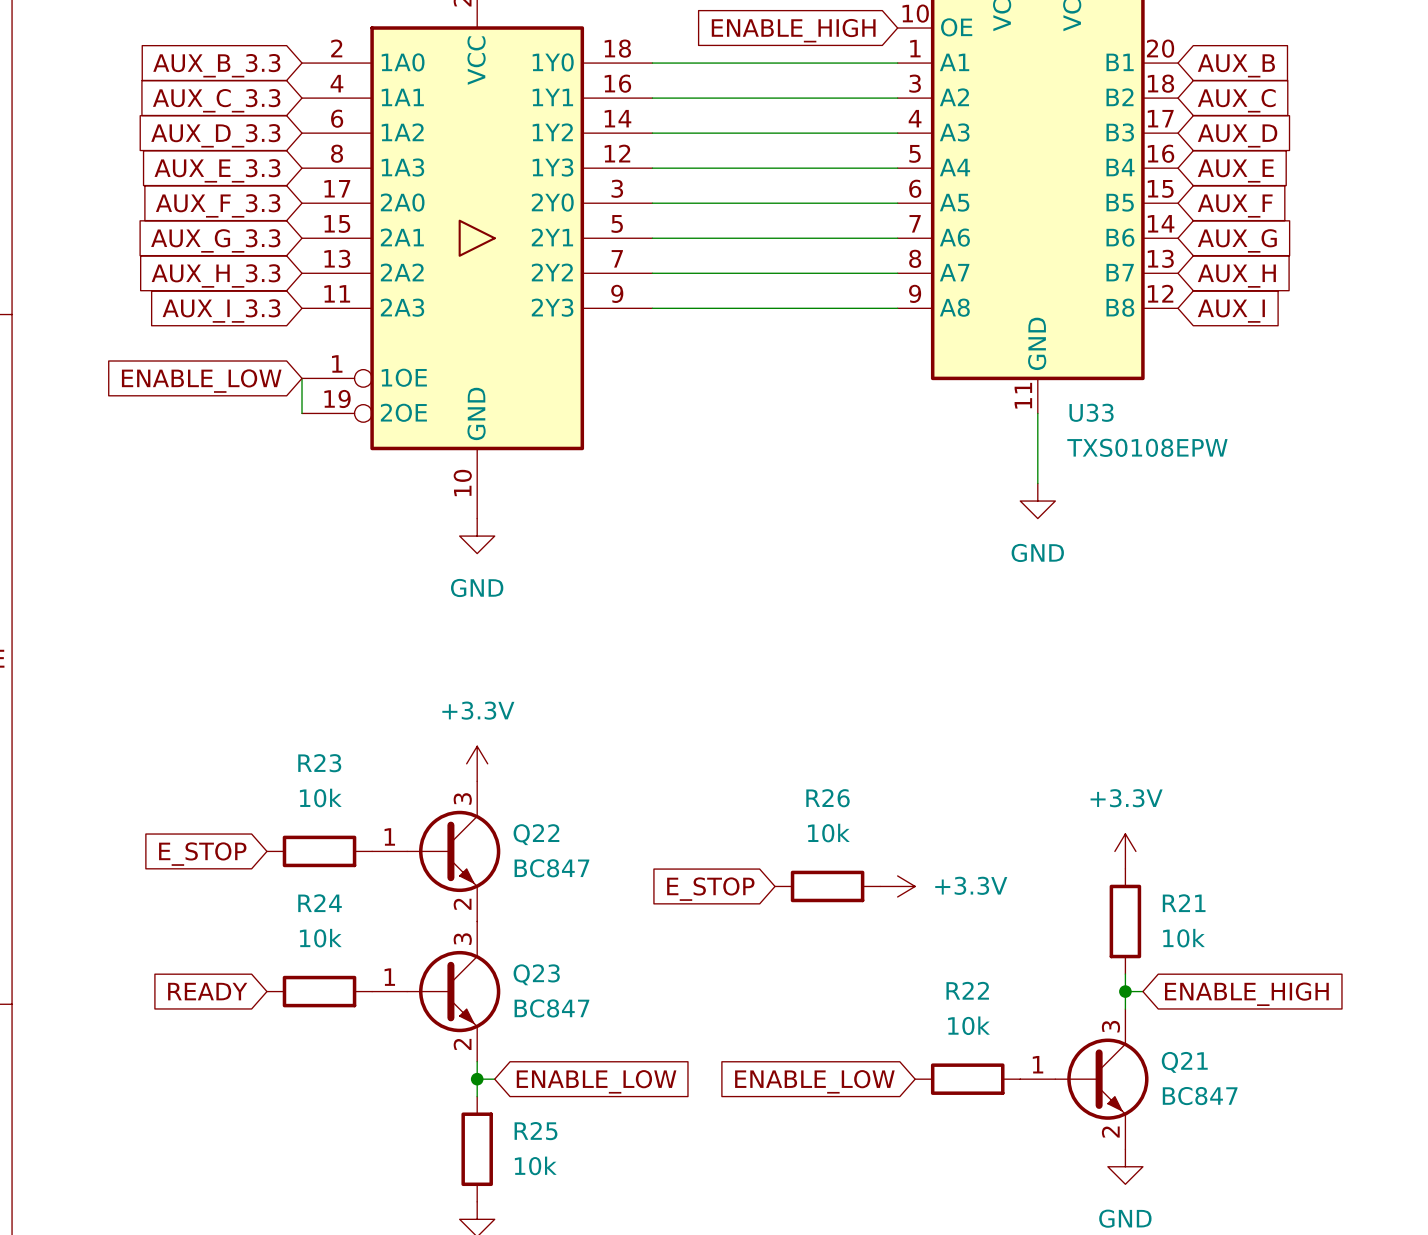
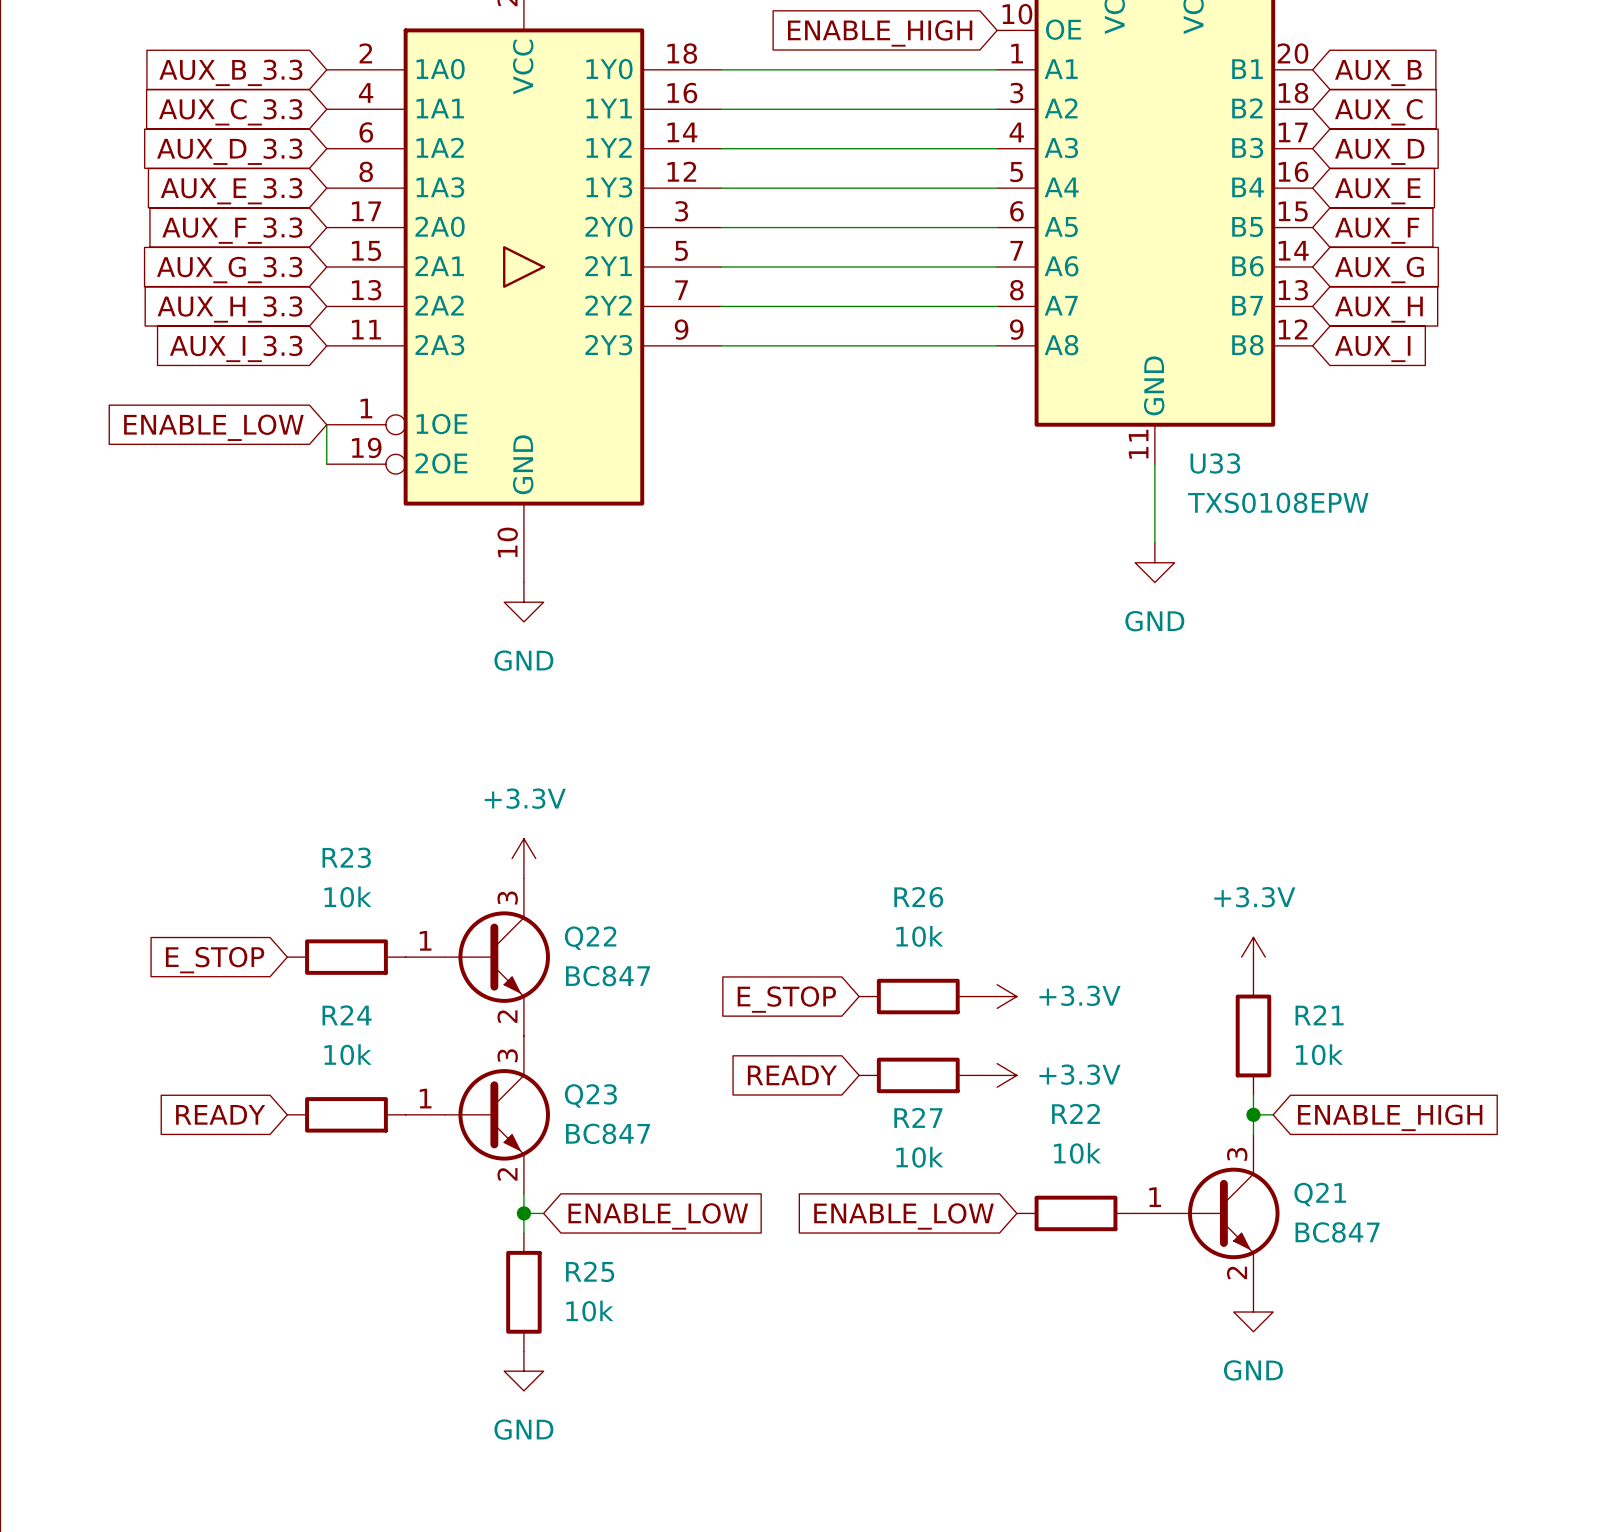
global label: none -> READY (792, 1075)
R27: none -> 10k (918, 1075)
power symbol: none -> +3.3V (997, 1075)

